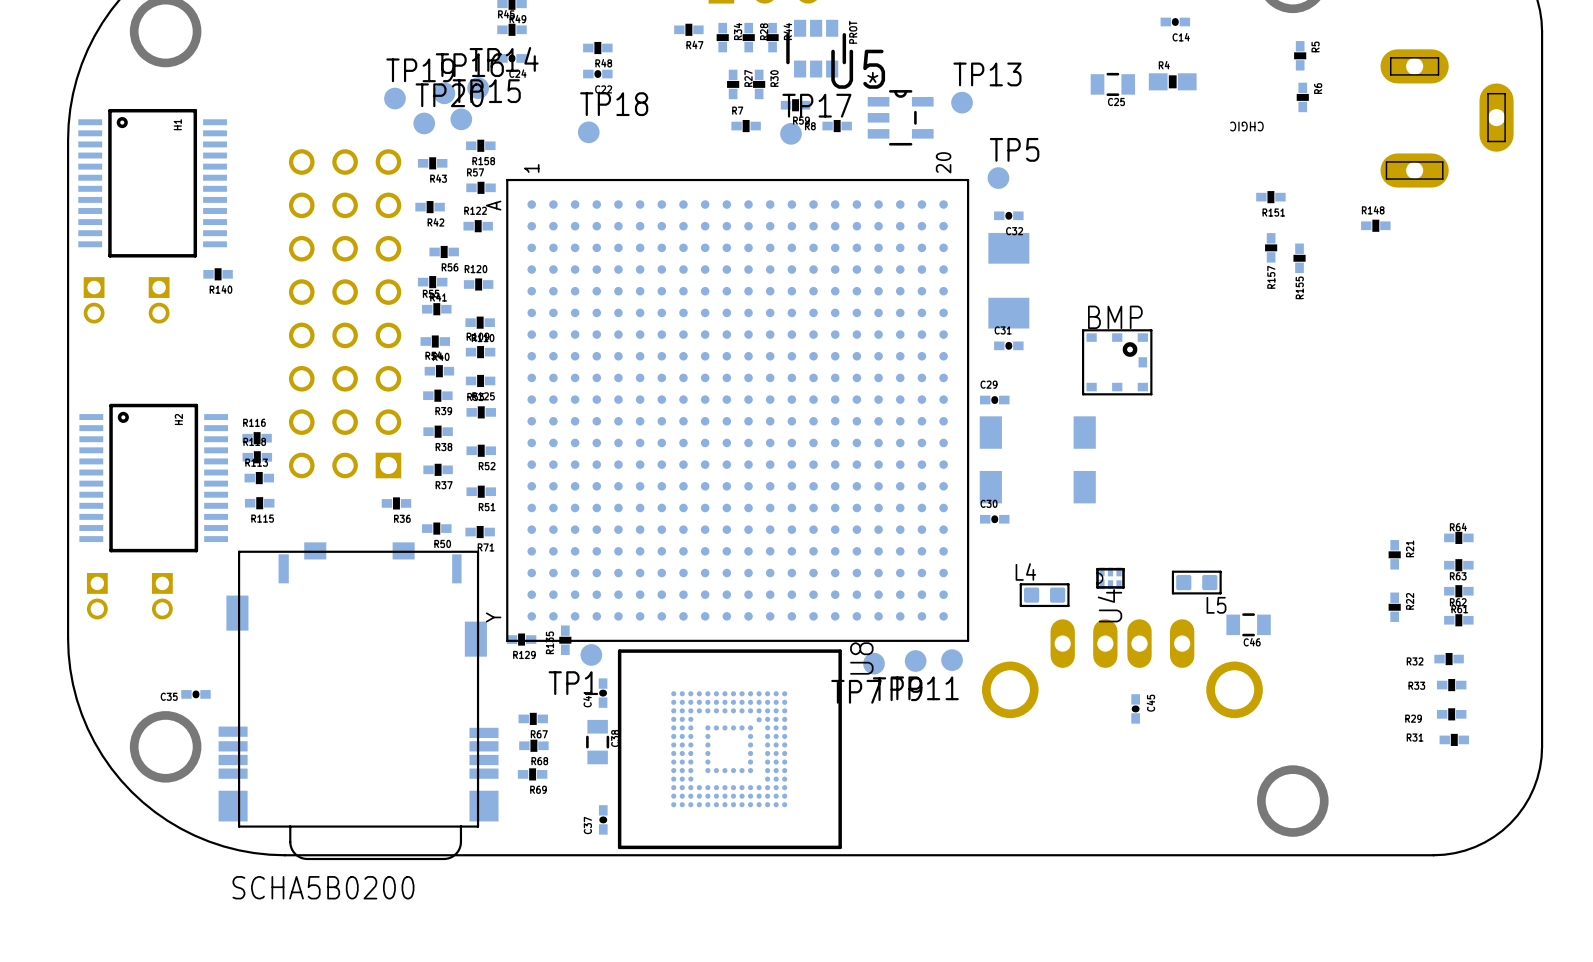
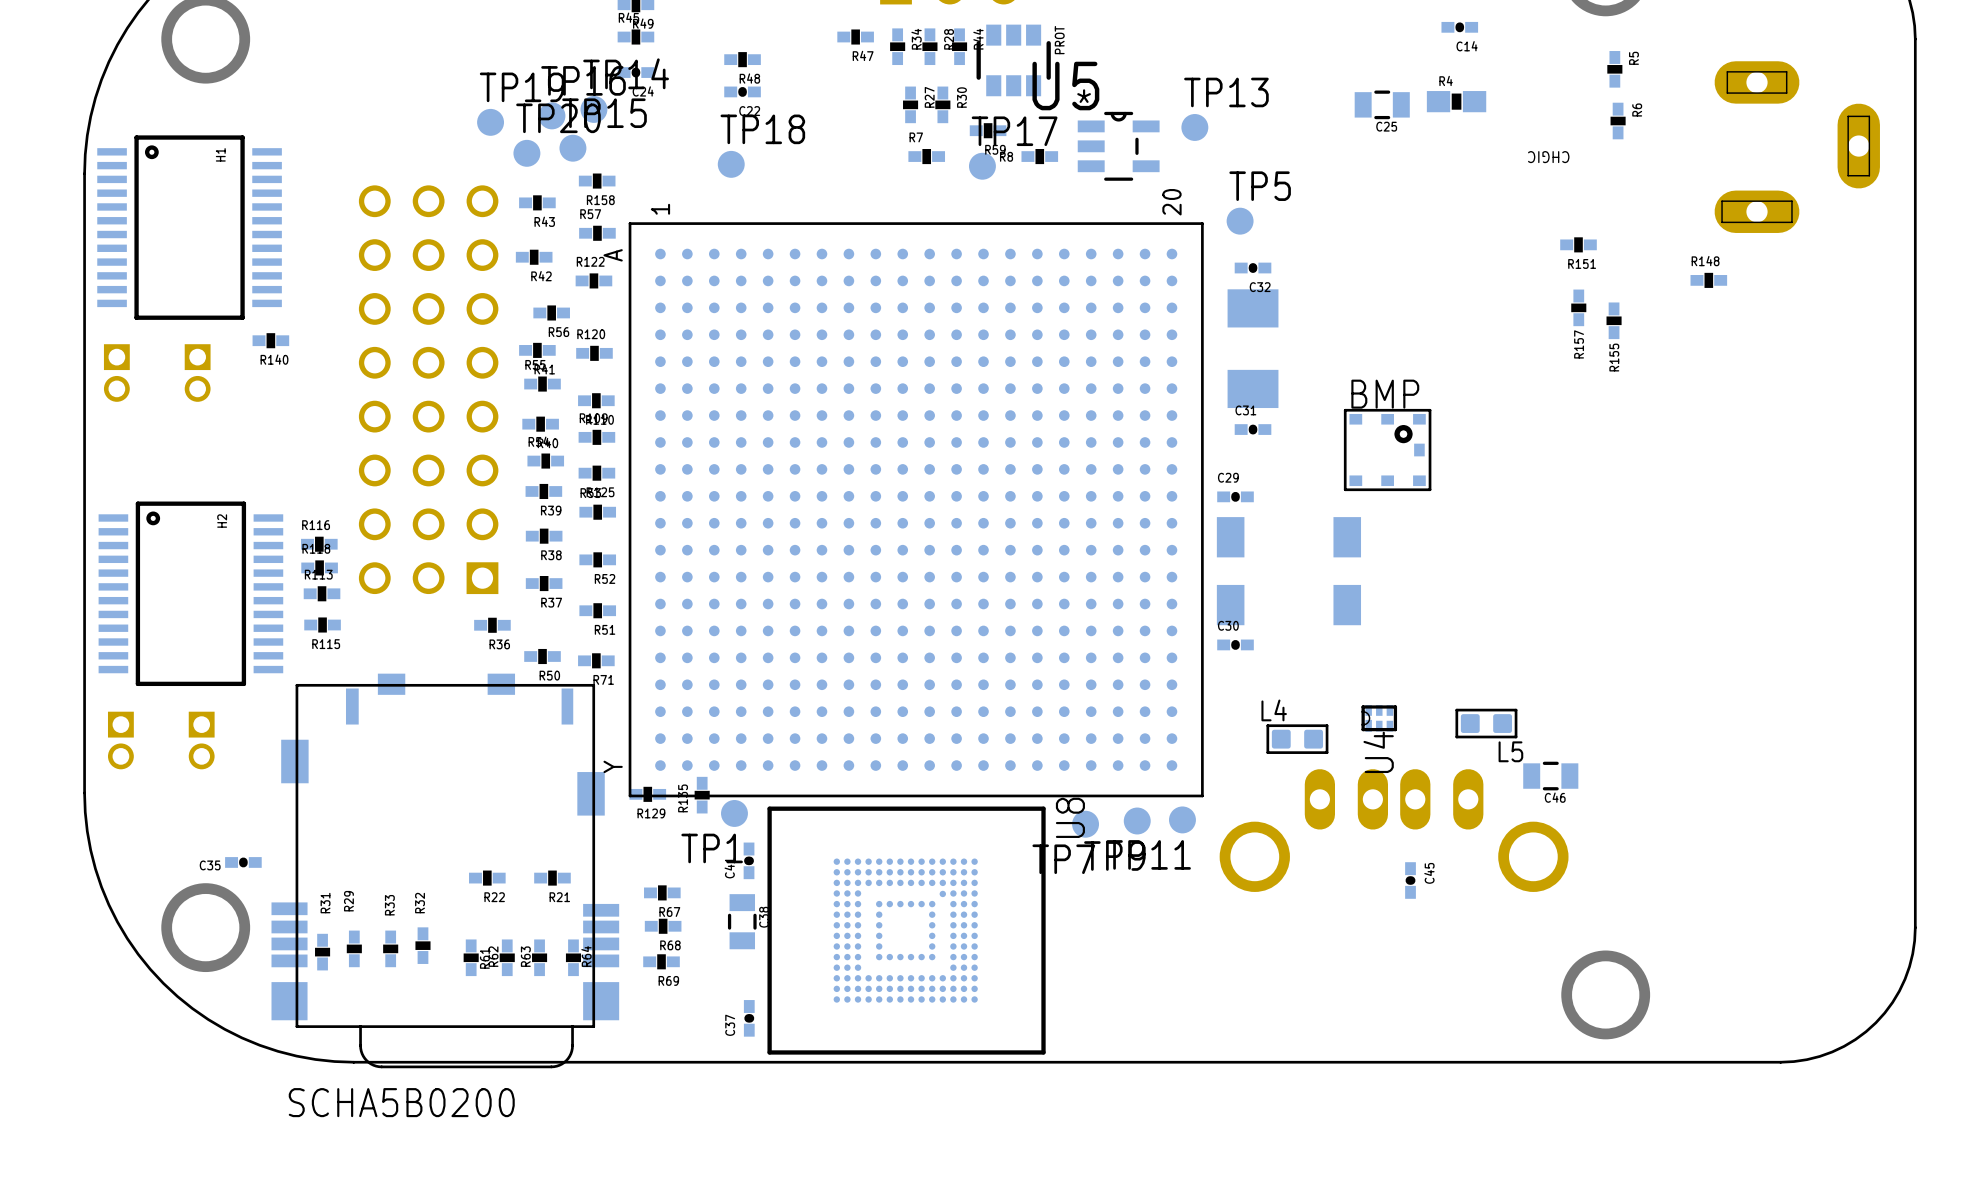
R64 rotation: 0° (1458, 537) -> 90° clockwise (573, 957)
R64 position: (1458, 537) -> (573, 957)
R21 rotation: 0° (1394, 554) -> 90° clockwise (552, 878)
R21 position: (1394, 554) -> (552, 878)
R63 rotation: 0° (1458, 565) -> 90° clockwise (539, 957)
R63 position: (1458, 565) -> (539, 957)
R62 rotation: 0° (1458, 591) -> 90° clockwise (507, 957)
R62 position: (1458, 591) -> (507, 957)
R22 rotation: 0° (1394, 607) -> 90° clockwise (487, 878)
R22 position: (1394, 607) -> (487, 878)
R61 rotation: 0° (1458, 620) -> 90° clockwise (471, 957)
R61 position: (1458, 620) -> (471, 957)
R32 rotation: 0° (1449, 659) -> 90° clockwise (422, 945)
R32 position: (1449, 659) -> (422, 945)
R33 rotation: 0° (1451, 685) -> 90° clockwise (390, 948)
R33 position: (1451, 685) -> (390, 948)
R29 rotation: 0° (1451, 714) -> 90° clockwise (354, 948)
R29 position: (1451, 714) -> (354, 948)
R31 rotation: 0° (1454, 739) -> 90° clockwise (322, 952)
R31 position: (1454, 739) -> (322, 952)

